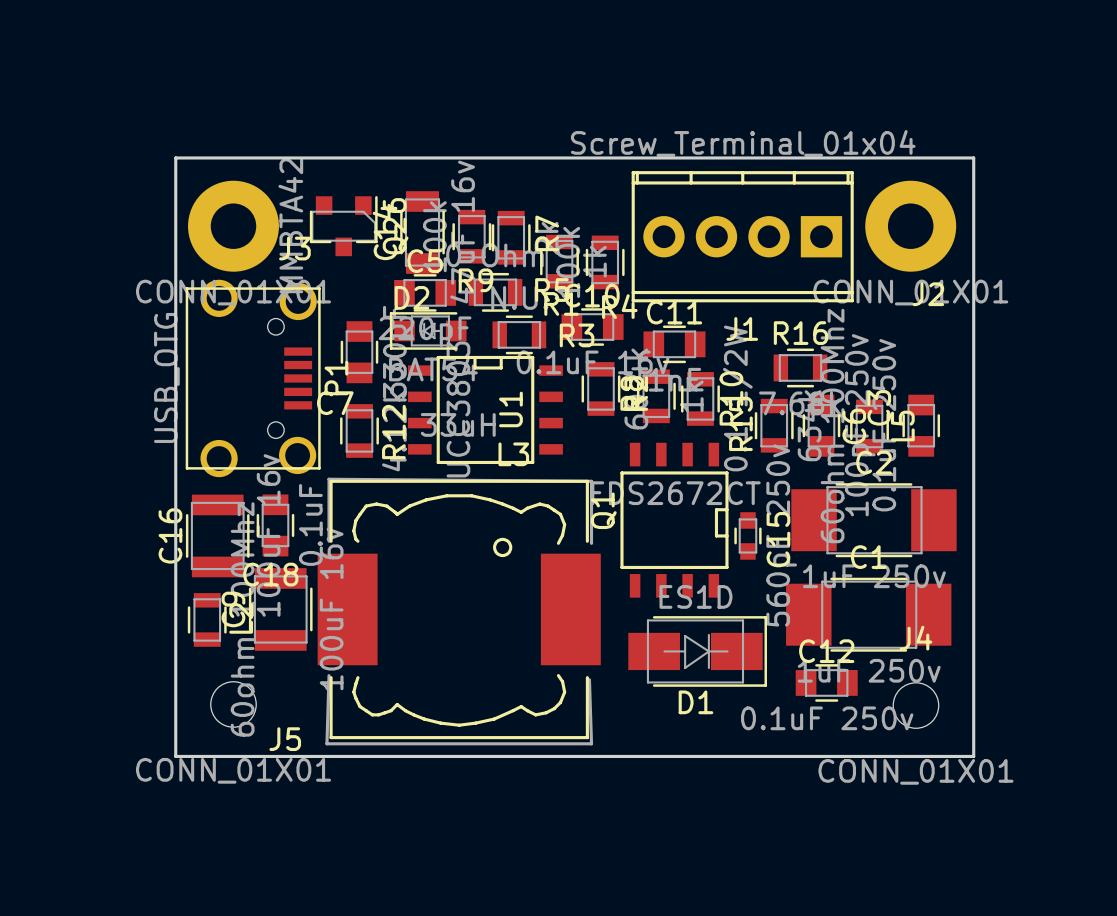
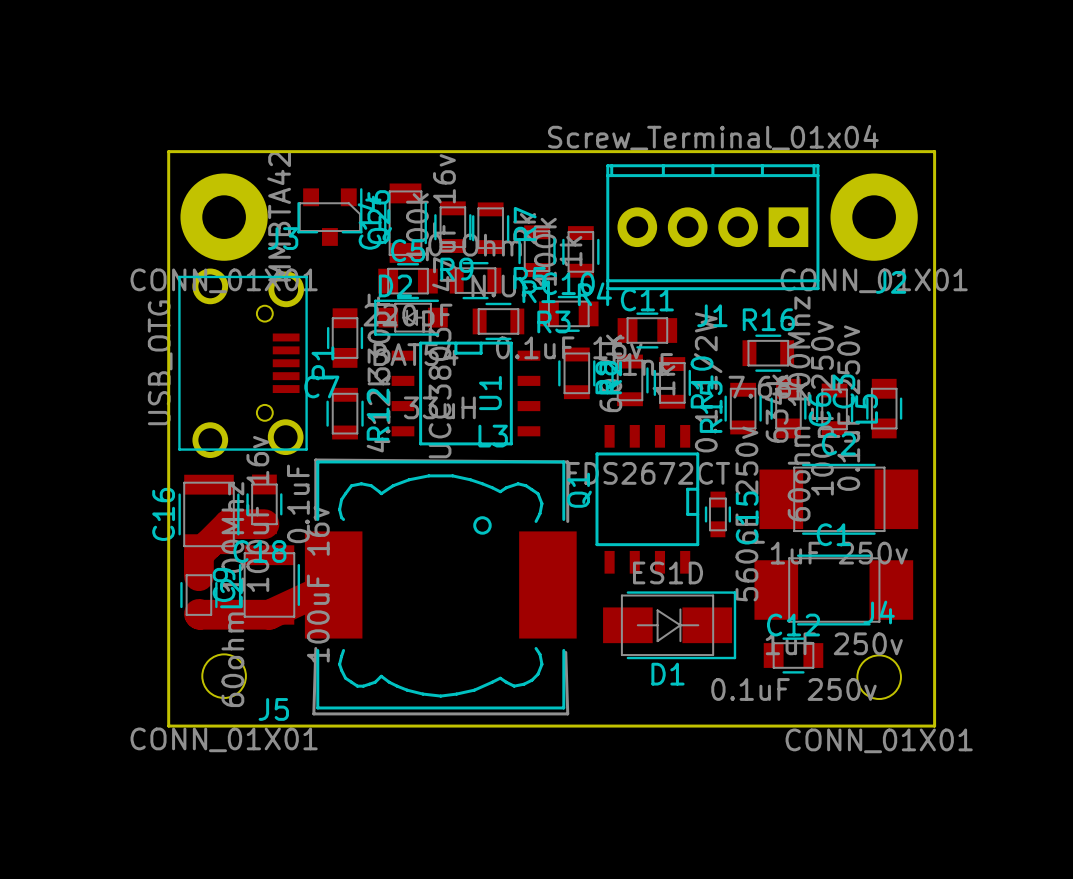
track: none -> (264, 524) (228, 524) (198, 554) (198, 576)
track: none -> (333, 584) (269, 614) (198, 613)

